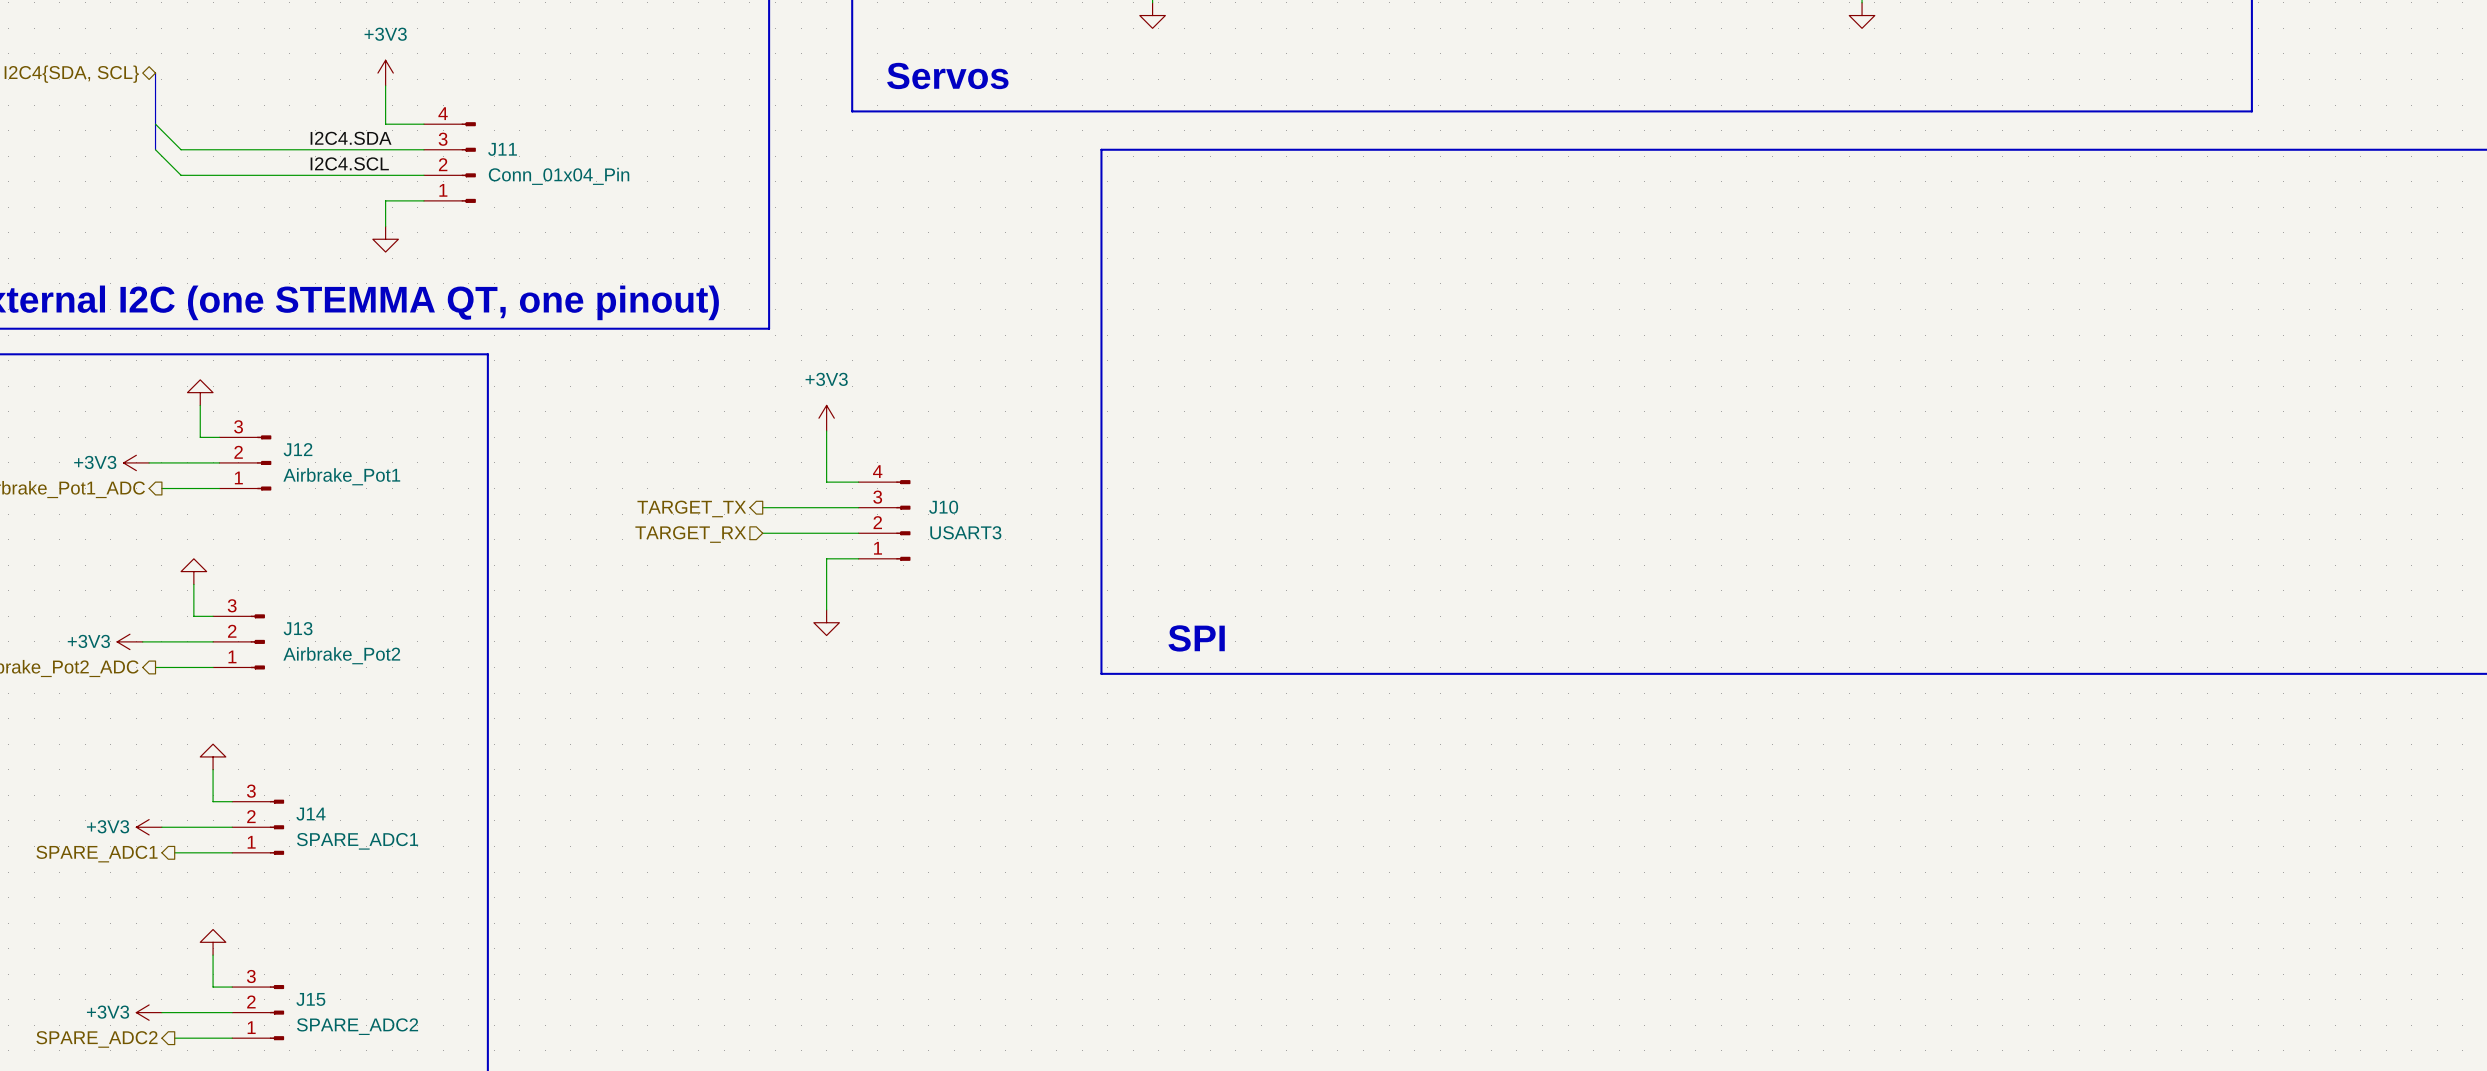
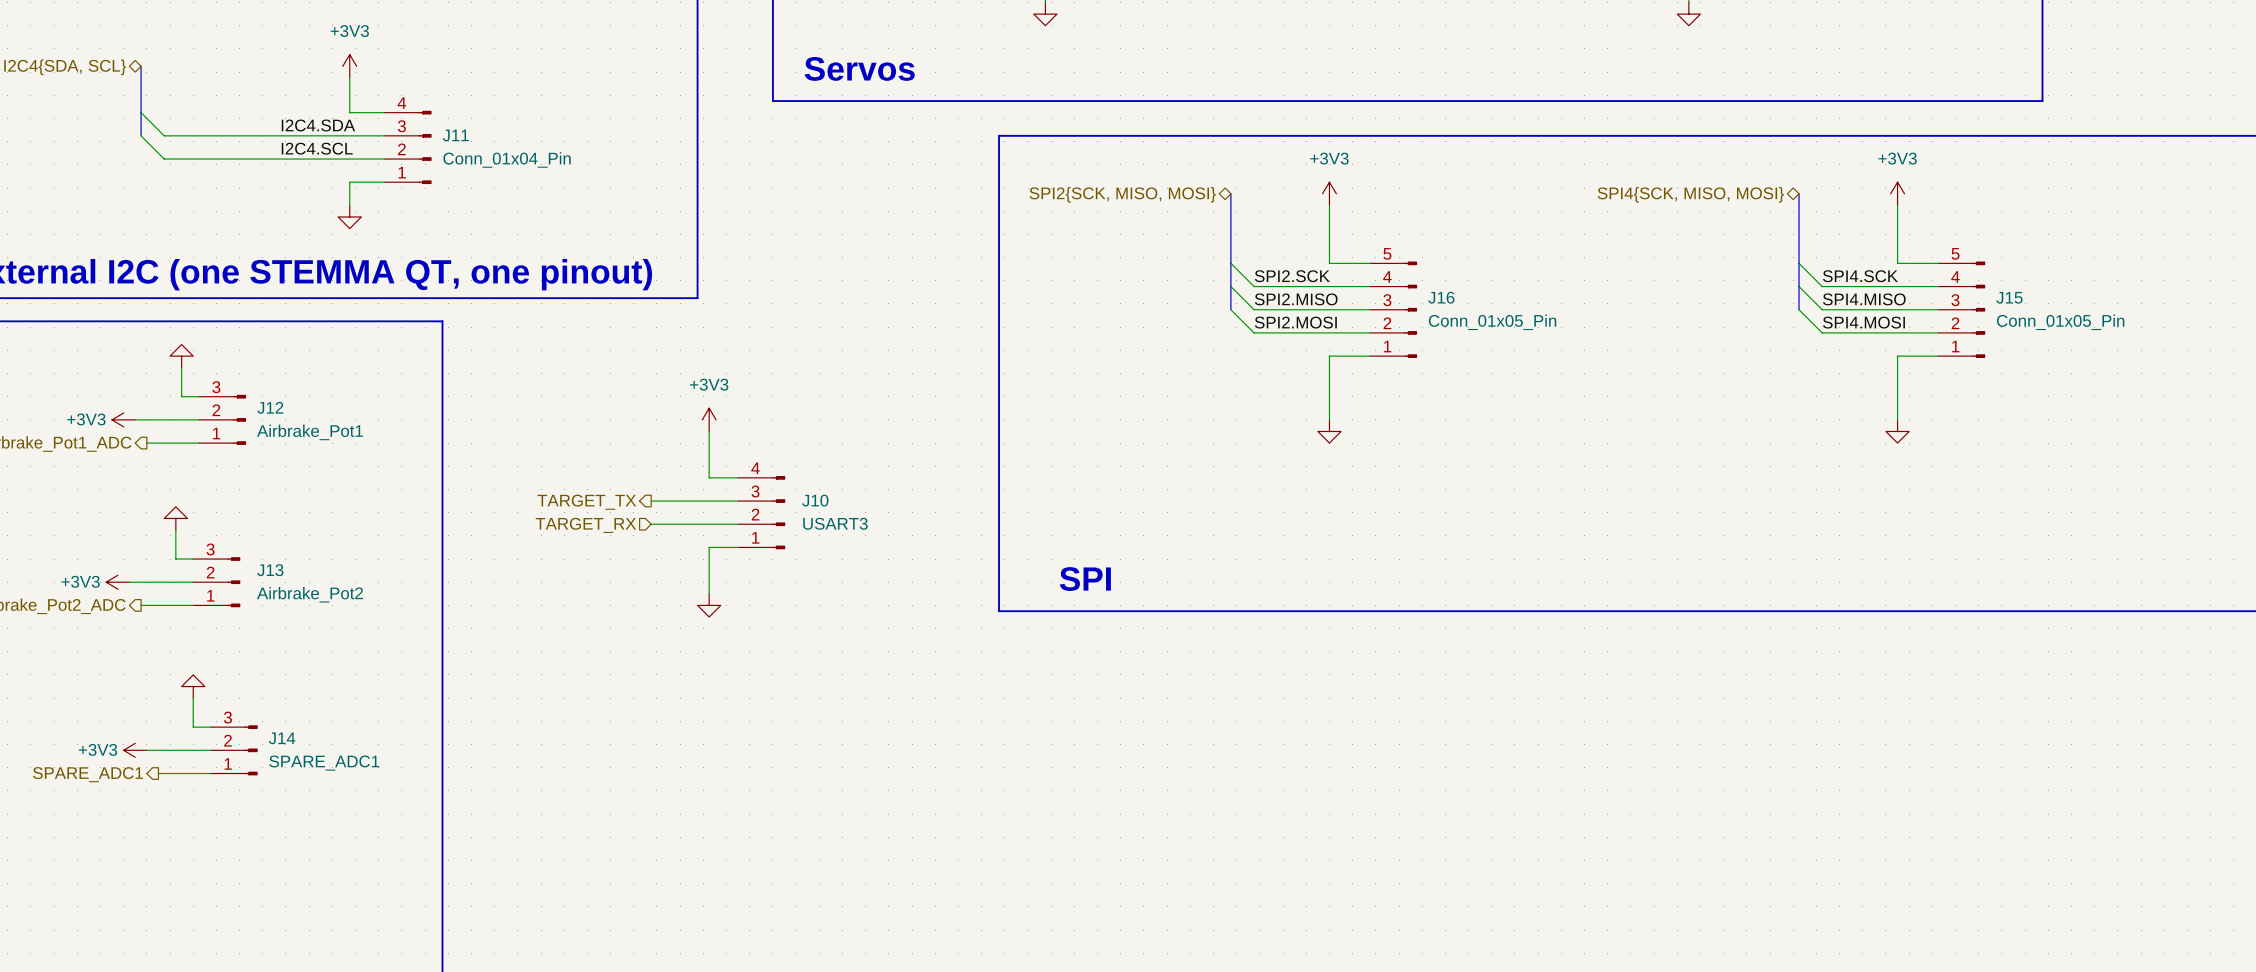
bus: none -> (1230, 193) (1230, 309)
power symbol: none -> +3V3 (1329, 193)
bus: none -> (1799, 193) (1799, 309)
power symbol: none -> +3V3 (1897, 193)
hierarchical label: none -> SPI2{SCK, MISO, MOSI} (1122, 194)
hierarchical label: none -> SPI4{SCK, MISO, MOSI} (1690, 194)
wire: none -> (1329, 205) (1329, 263) (1370, 263)
wire: none -> (1897, 205) (1897, 263) (1938, 263)
wire: none -> (1230, 263) (1254, 286) (1370, 286)
wire: none -> (1799, 263) (1822, 286)
label: none -> SPI2.SCK (1292, 276)
label: none -> SPI4.SCK (1860, 276)
wire: none -> (1230, 286) (1254, 309)
wire: none -> (1799, 286) (1822, 309)
wire: none -> (1822, 286) (1938, 286)
label: none -> SPI2.MISO (1296, 299)
label: none -> SPI4.MISO (1864, 299)
wire: none -> (1230, 309) (1254, 332) (1370, 332)
wire: none -> (1254, 309) (1370, 309)
J16: none -> Conn_01x05_Pin (1393, 309)
wire: none -> (1799, 309) (1822, 332)
wire: none -> (1822, 309) (1938, 309)
label: none -> SPI2.MOSI (1295, 322)
label: none -> SPI4.MOSI (1863, 322)
wire: none -> (1822, 332) (1938, 332)
wire: none -> (1370, 356) (1329, 356) (1329, 419)
wire: none -> (1938, 356) (1897, 356) (1897, 419)
power symbol position: +3V3 (826, 418) -> +3V3 (709, 419)
wire: (826, 430) (826, 482) (858, 482) -> (709, 431) (709, 477) (738, 477)
power symbol: none -> (1329, 431)
power symbol: none -> (1897, 431)
wire: (762, 507) (858, 507) -> (651, 501) (738, 501)
hierarchical label position: TARGET_TX (691, 508) -> TARGET_TX (586, 502)
J10 position: (884, 520) -> (761, 512)
wire: (762, 533) (858, 533) -> (651, 524) (738, 524)
hierarchical label position: TARGET_RX (690, 534) -> TARGET_RX (585, 525)
wire: (858, 558) (826, 558) (826, 609) -> (738, 547) (709, 547) (709, 593)
power symbol position: (826, 622) -> (709, 605)
power symbol: (213, 942) -> none
wire: (213, 955) (213, 987) (232, 987) -> none
J15 symbol: [232, 985, 285, 1041] -> [1938, 261, 1986, 358]
power symbol: +3V3 (149, 1012) -> none
wire: (161, 1012) (232, 1012) -> none
J15 value: SPARE_ADC2 (357, 1026) -> Conn_01x05_Pin (2060, 322)
wire: (174, 1038) (232, 1038) -> none
hierarchical label: SPARE_ADC2 (96, 1039) -> none

